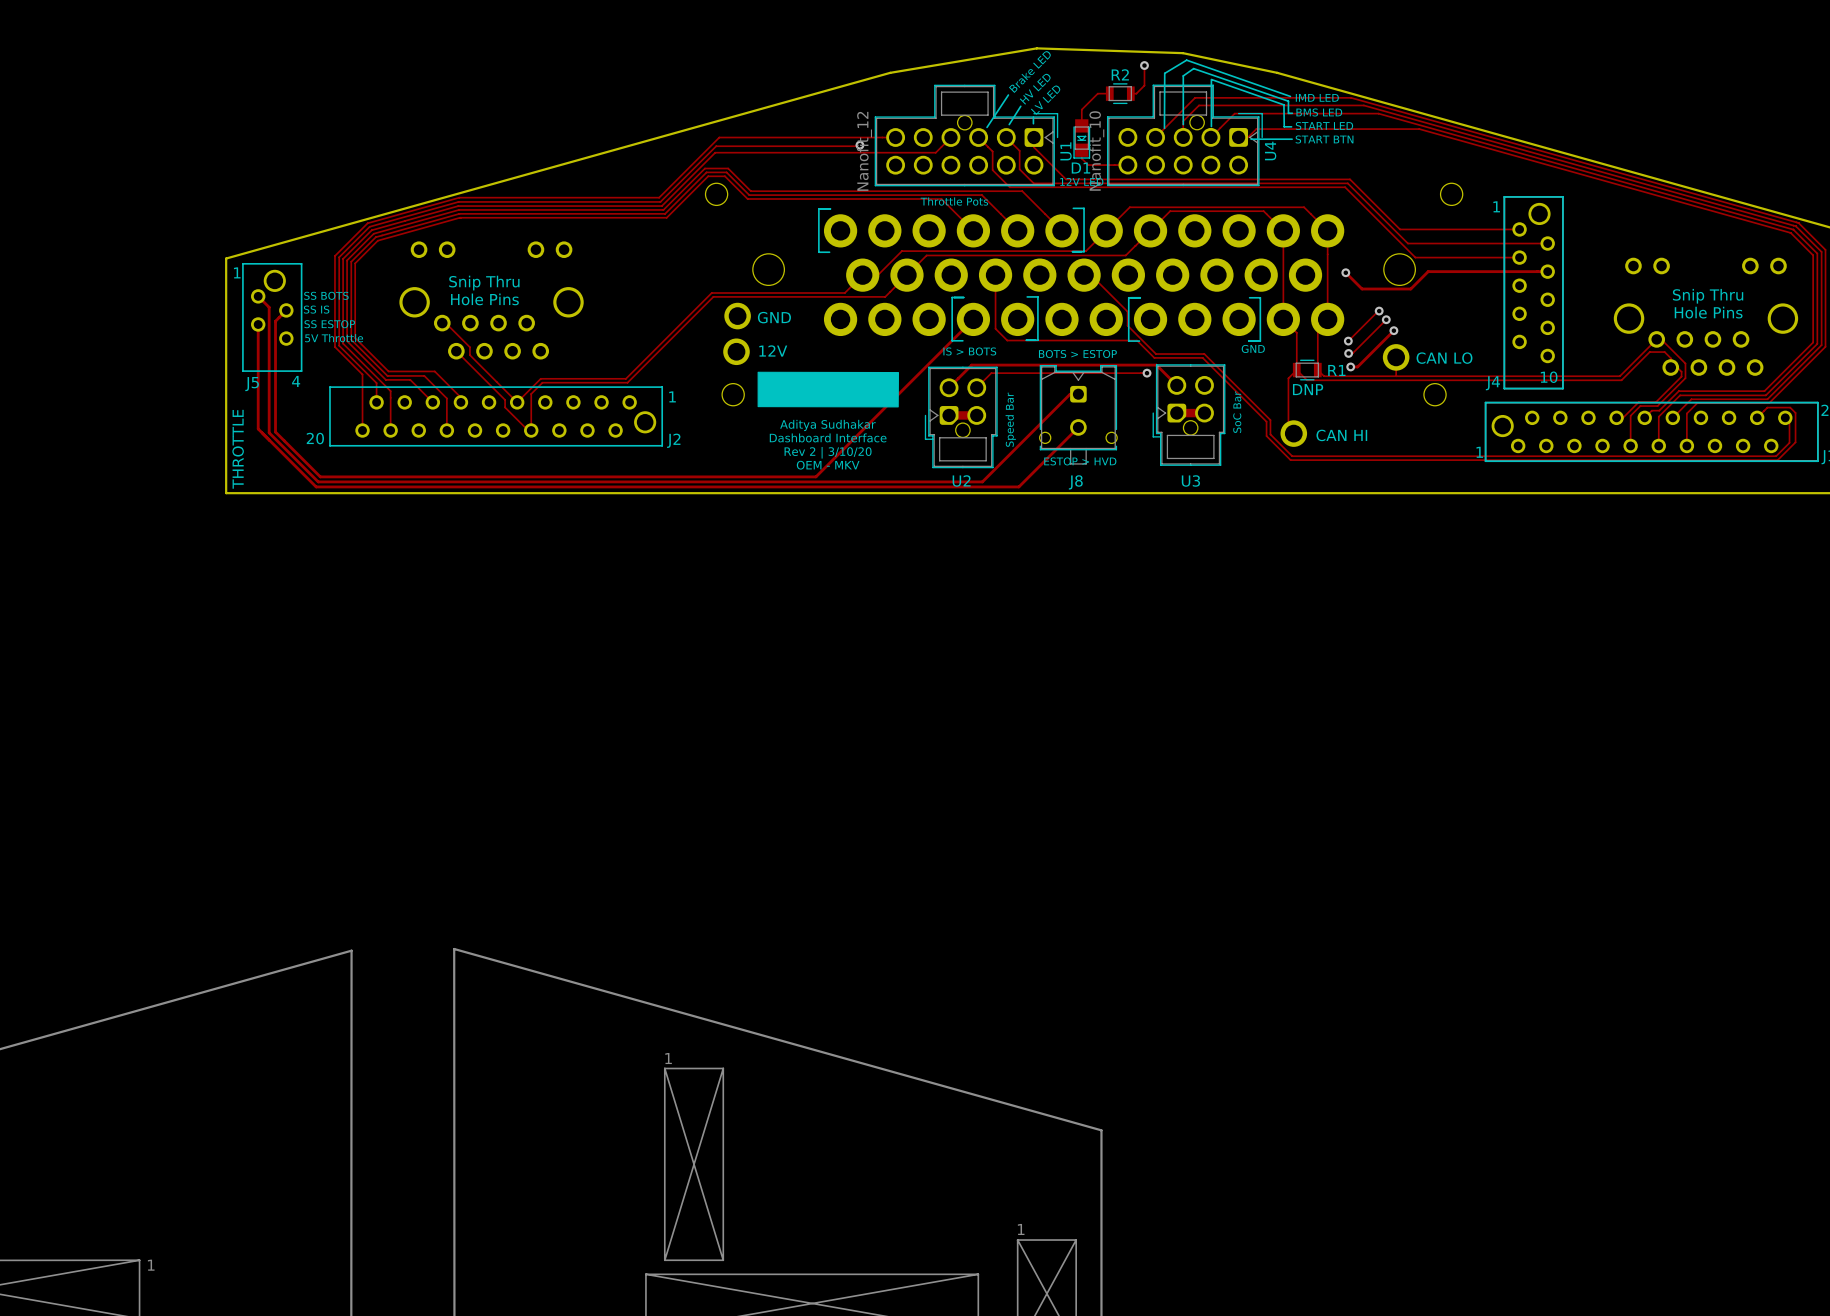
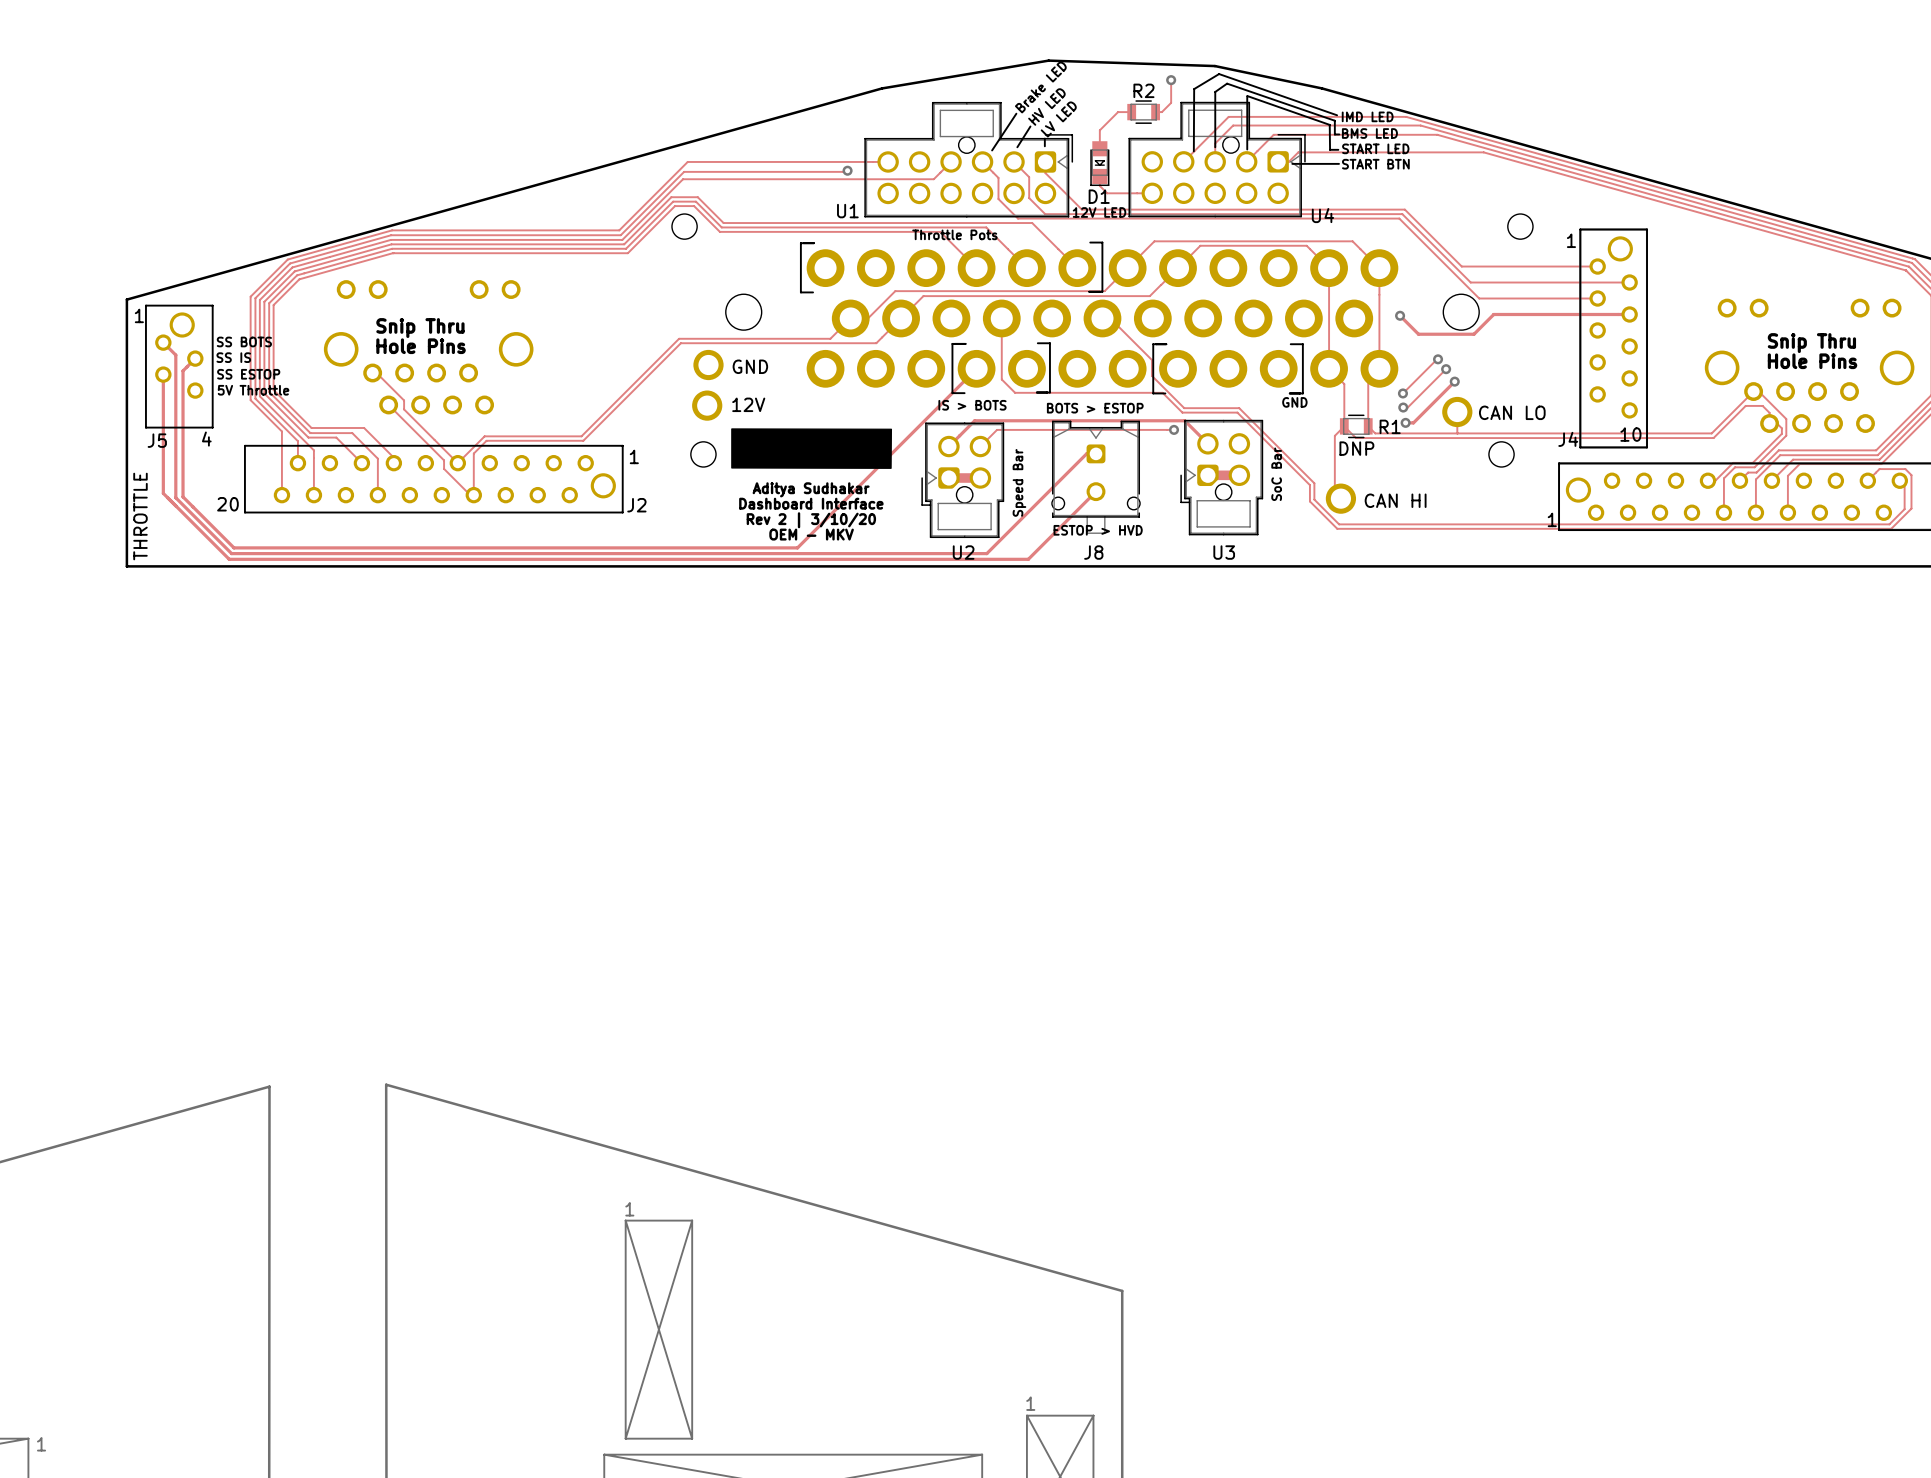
U4 value: Nanofit_10 (1096, 150) -> none
U4 name rotation: 0° (1270, 150) -> 90° clockwise (1322, 215)
U4 name position: U4 (1270, 150) -> U4 (1322, 215)
U1 value: Nanofit_12 (864, 151) -> none
U1 name rotation: 0° (1066, 151) -> 90° clockwise (847, 211)
U1 name position: U1 (1066, 151) -> U1 (847, 211)

